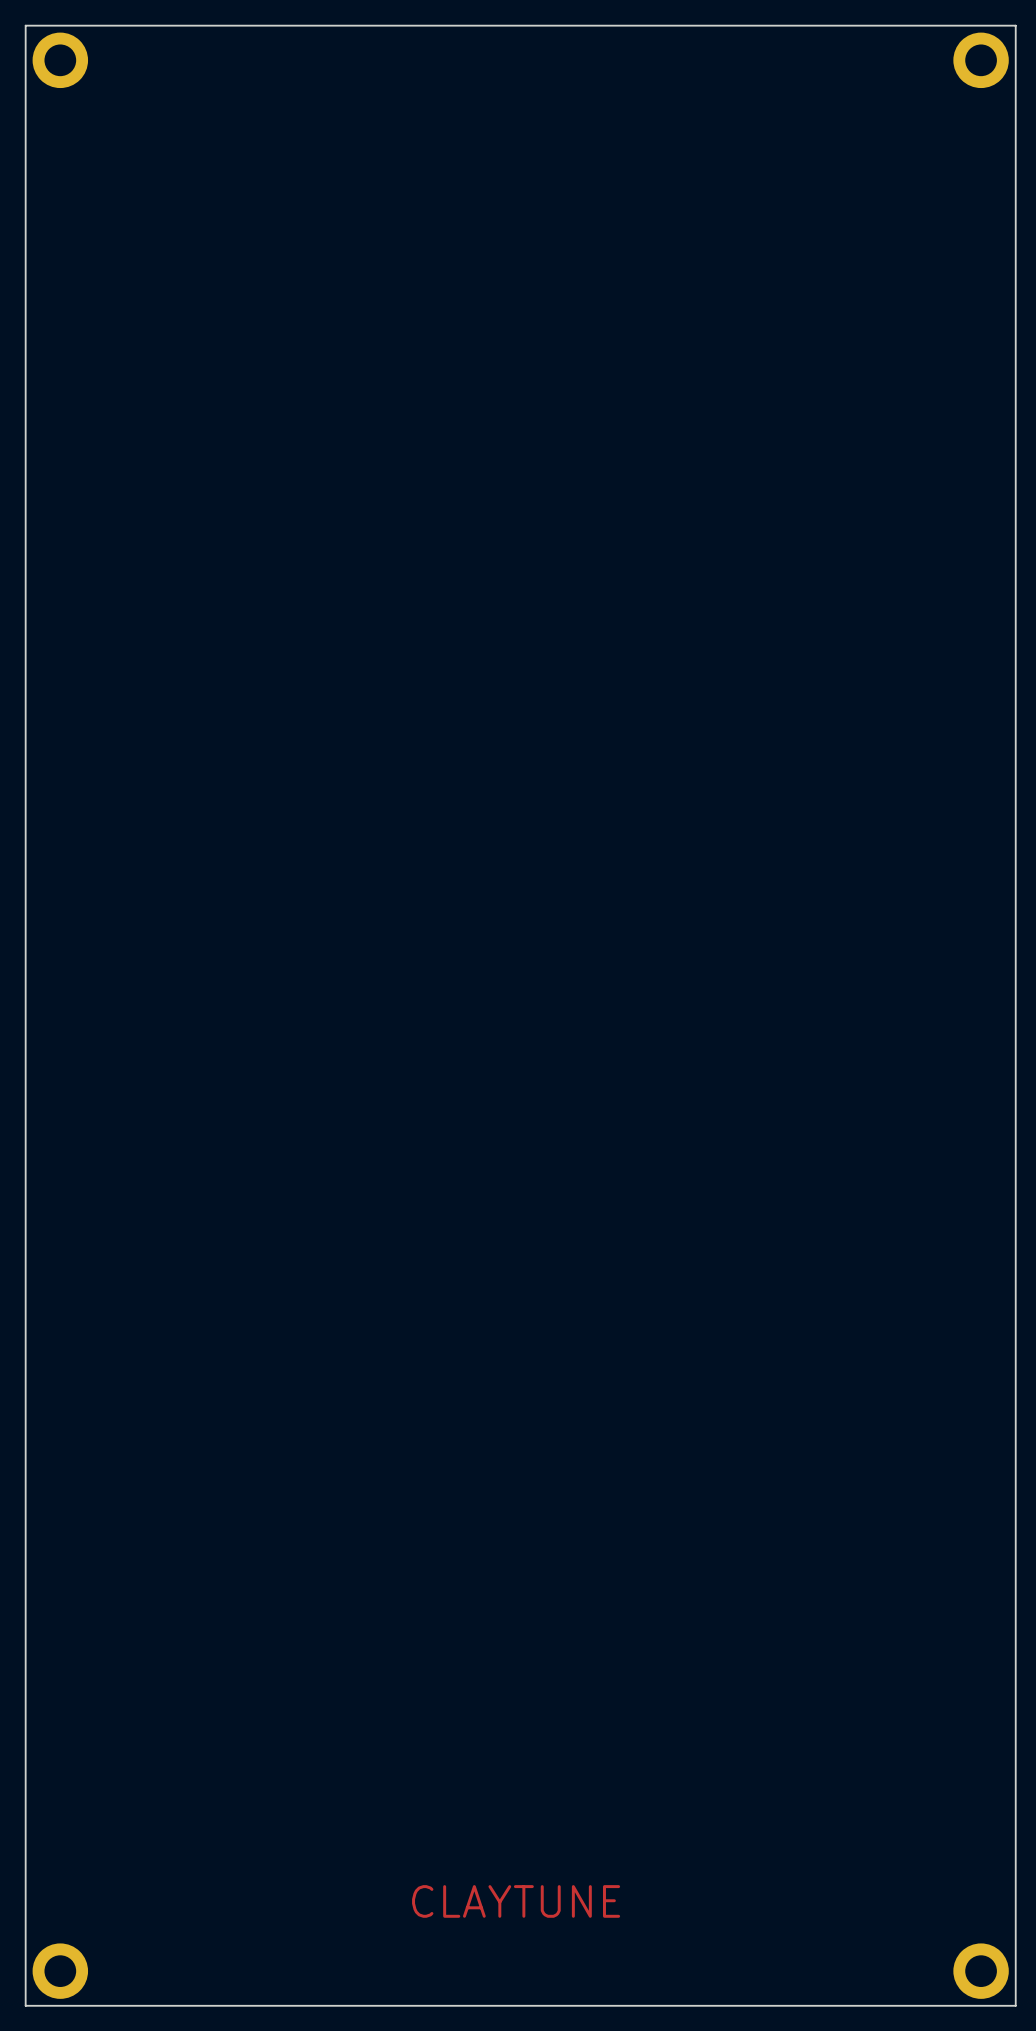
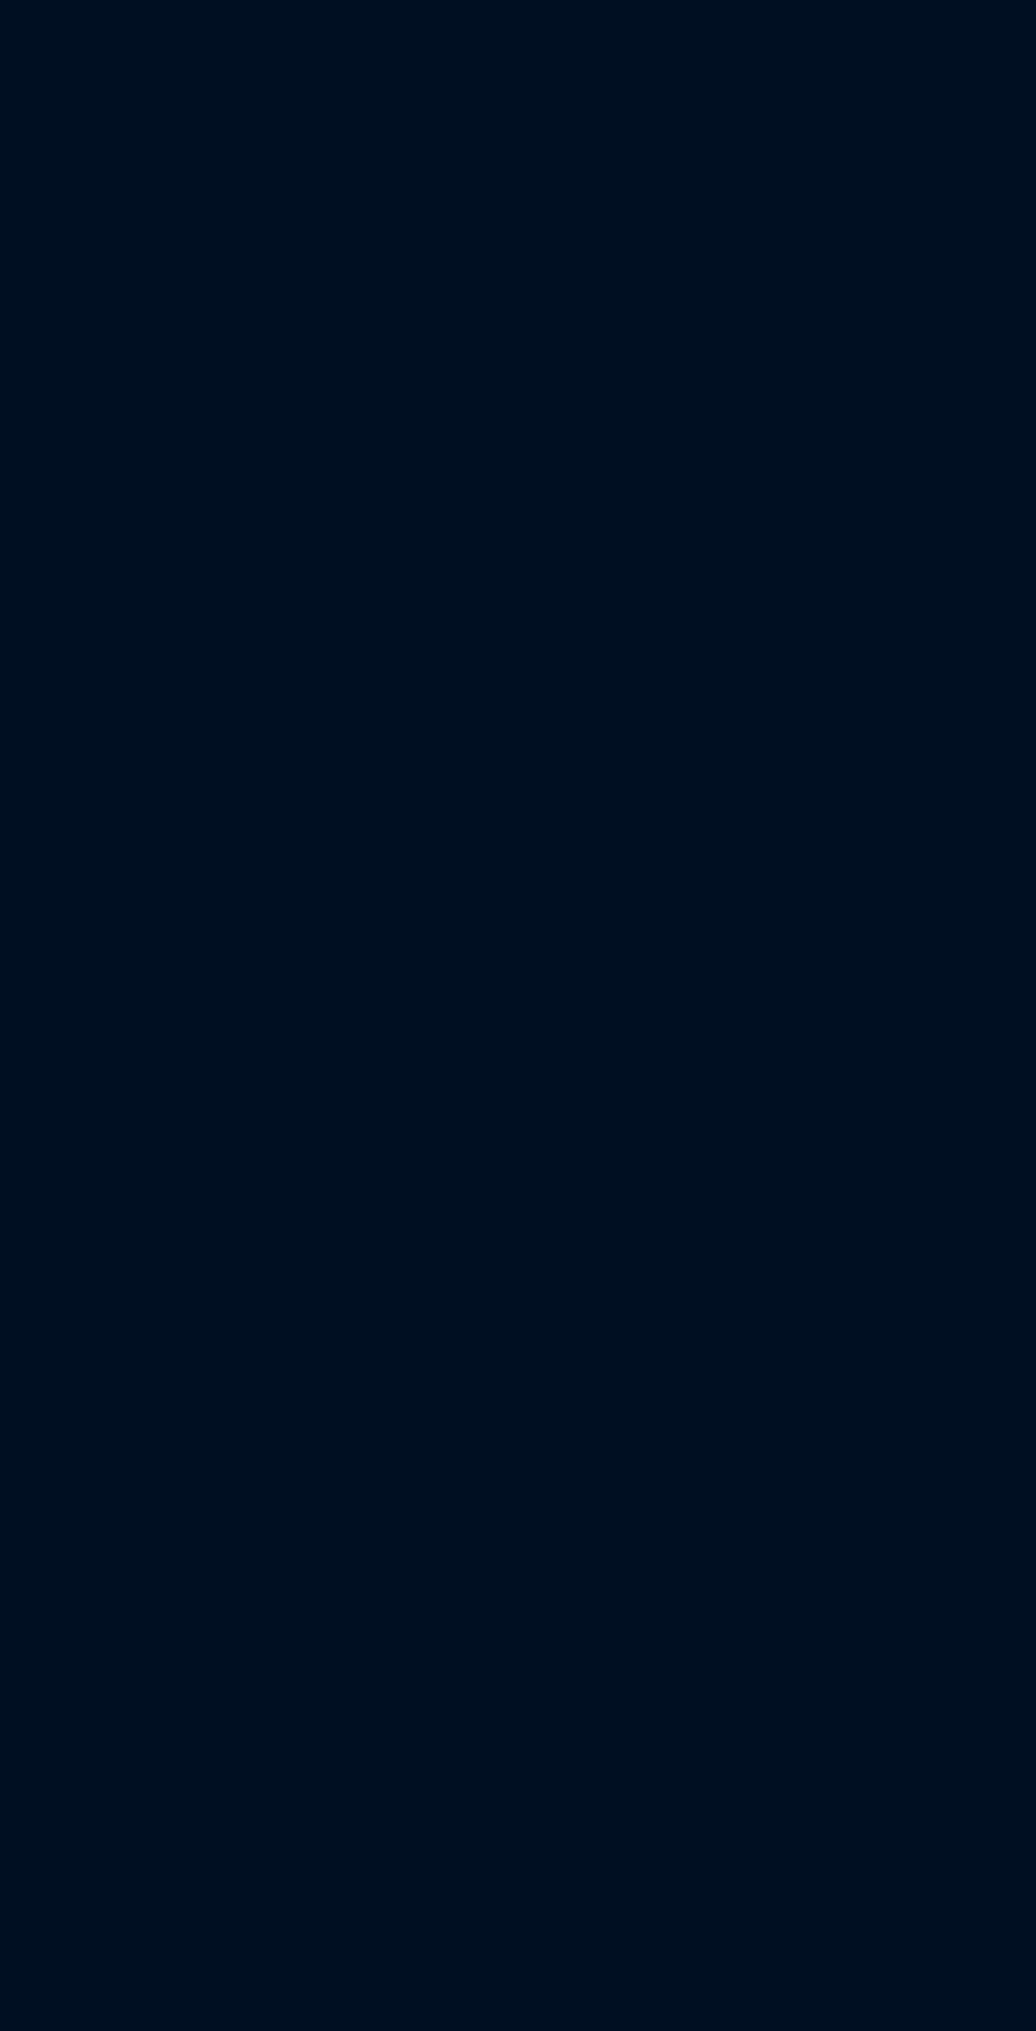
board edge: (25, 25) (1015, 25) (1015, 2005) (25, 2005) (25, 25) -> none
part: (60, 60) -> none
part: (981, 60) -> none
text: CLAYTUNE (516, 1901) -> none
part: (60, 1971) -> none
part: (981, 1971) -> none

